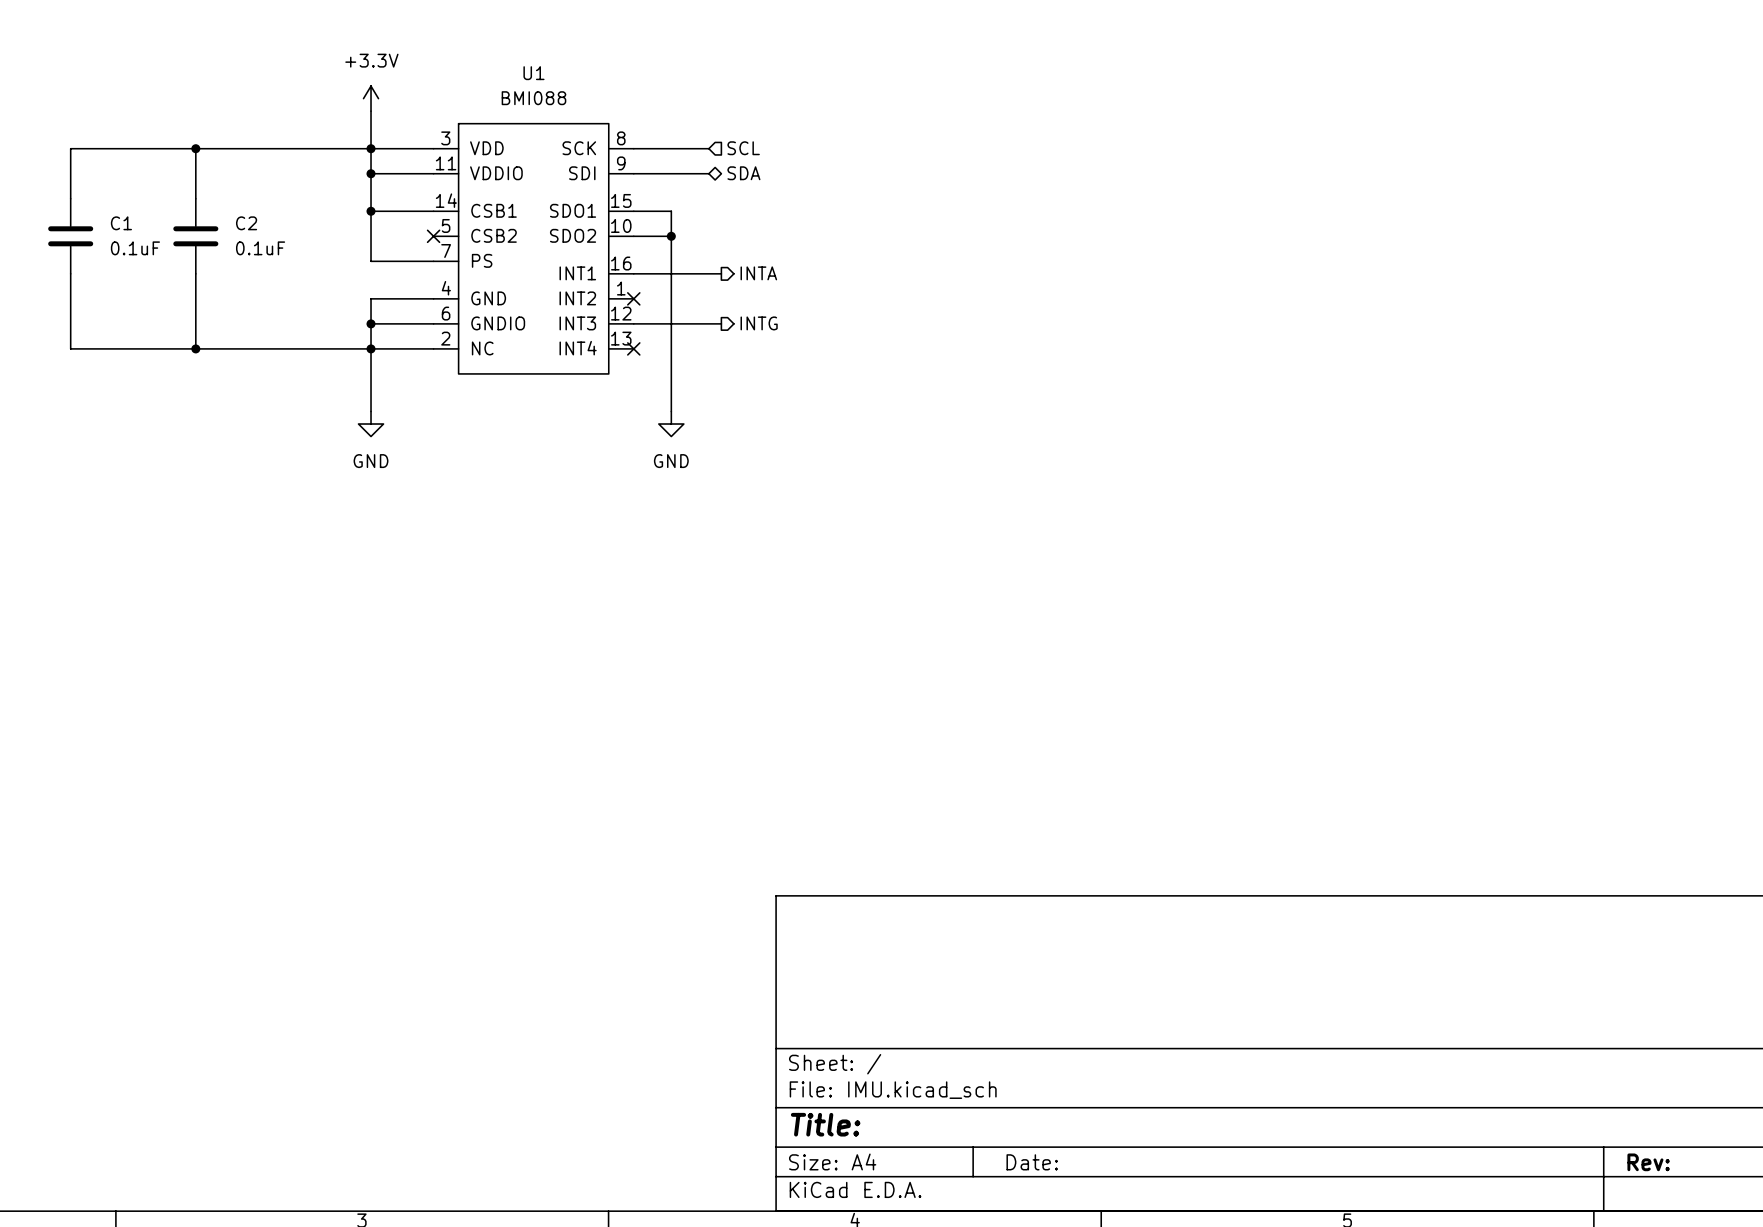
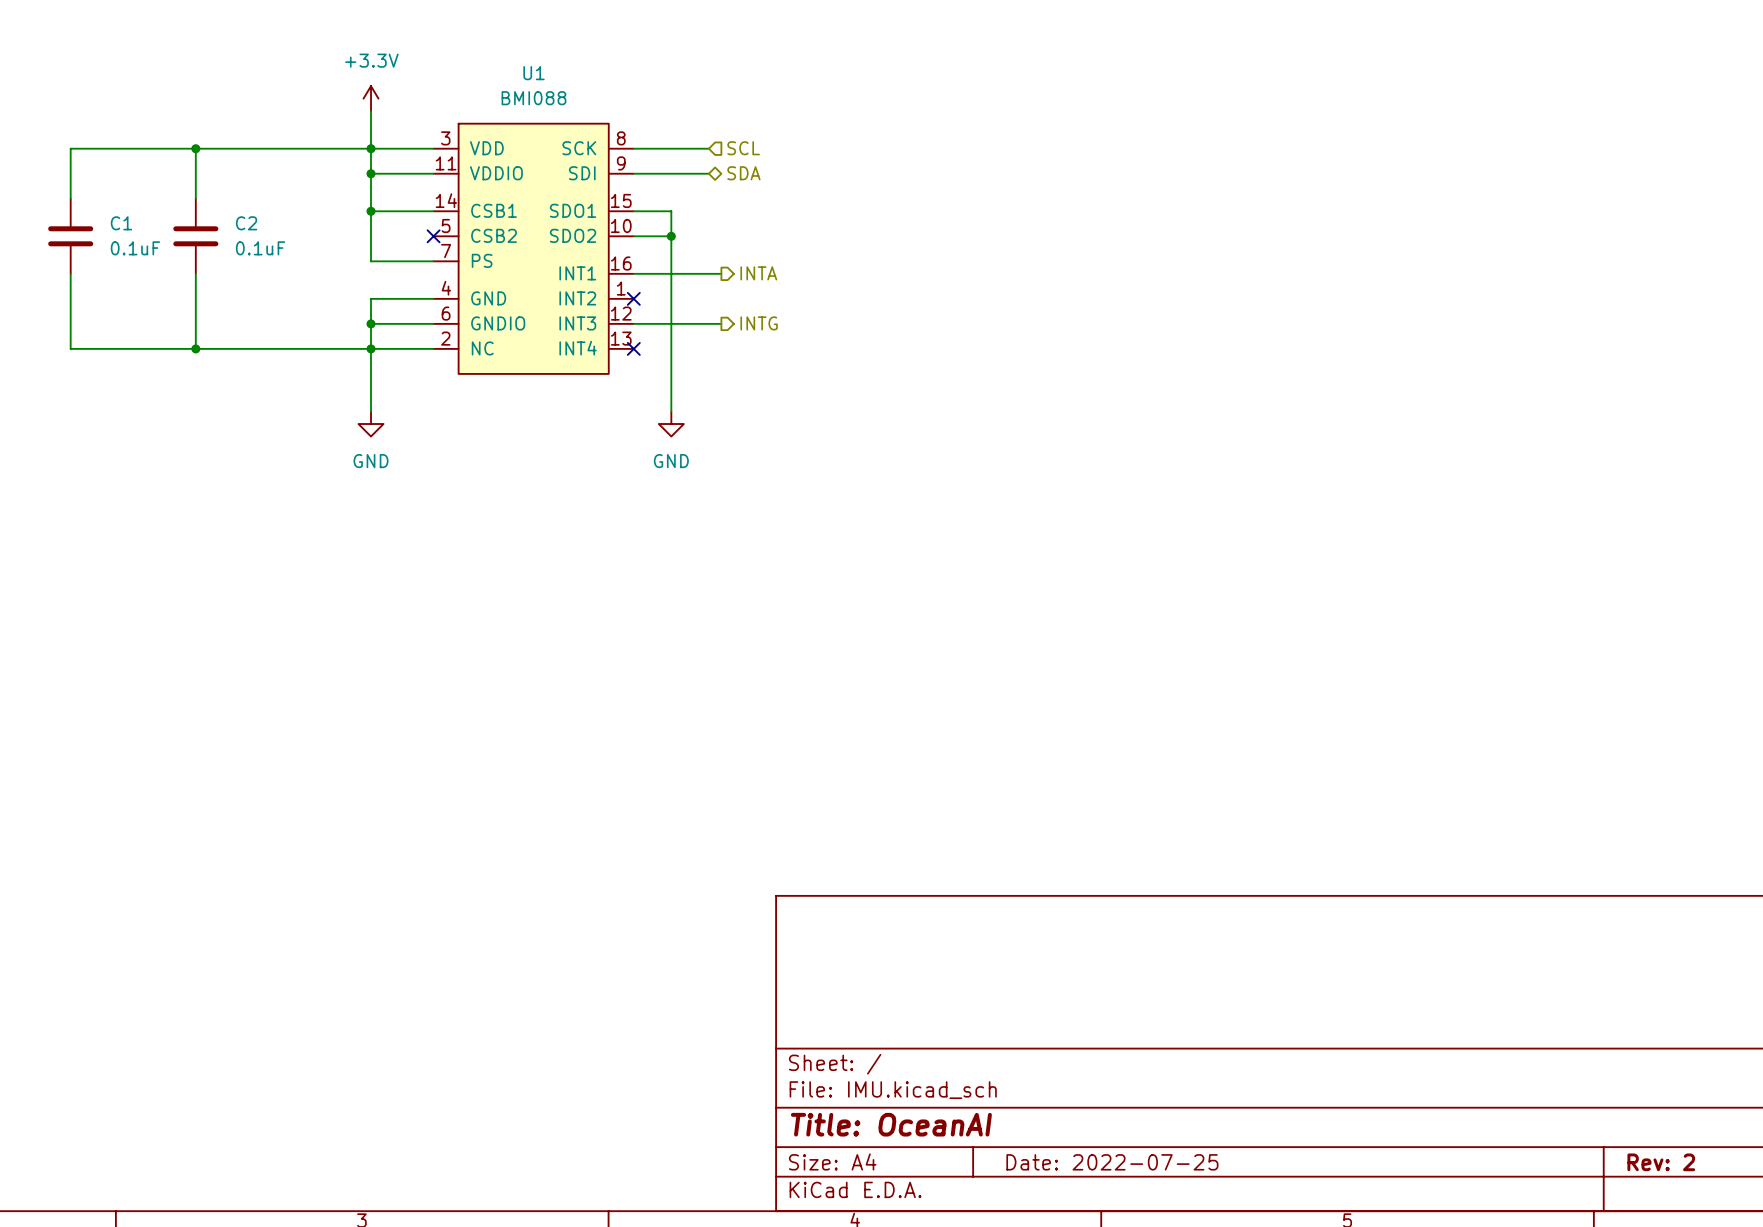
title block: Title: (825, 1124) -> Title: OceanAI (891, 1124)
title block: Date: (1032, 1162) -> Date: 2022-07-25 (1112, 1162)
title block: Rev: (1648, 1162) -> Rev: 2 (1661, 1162)

